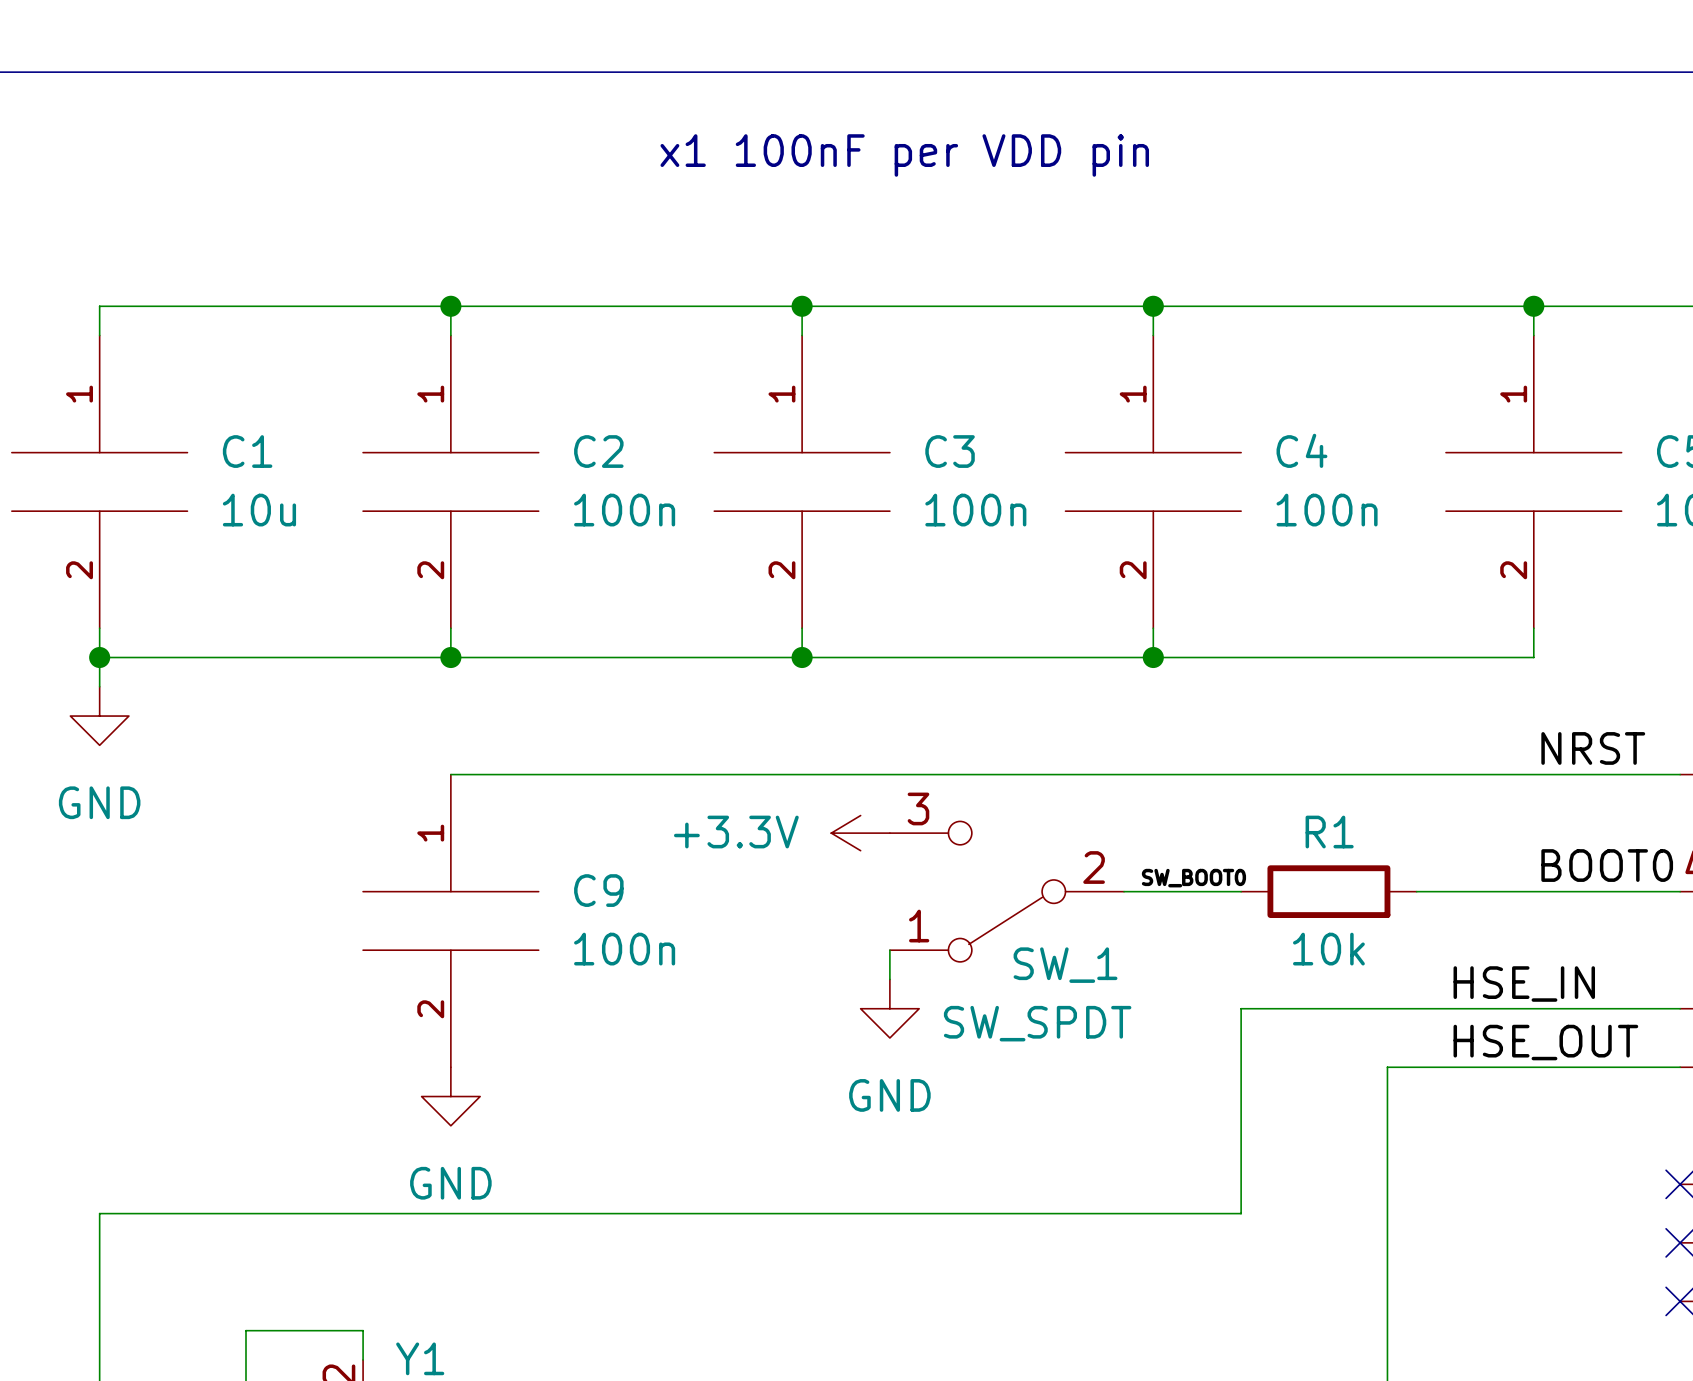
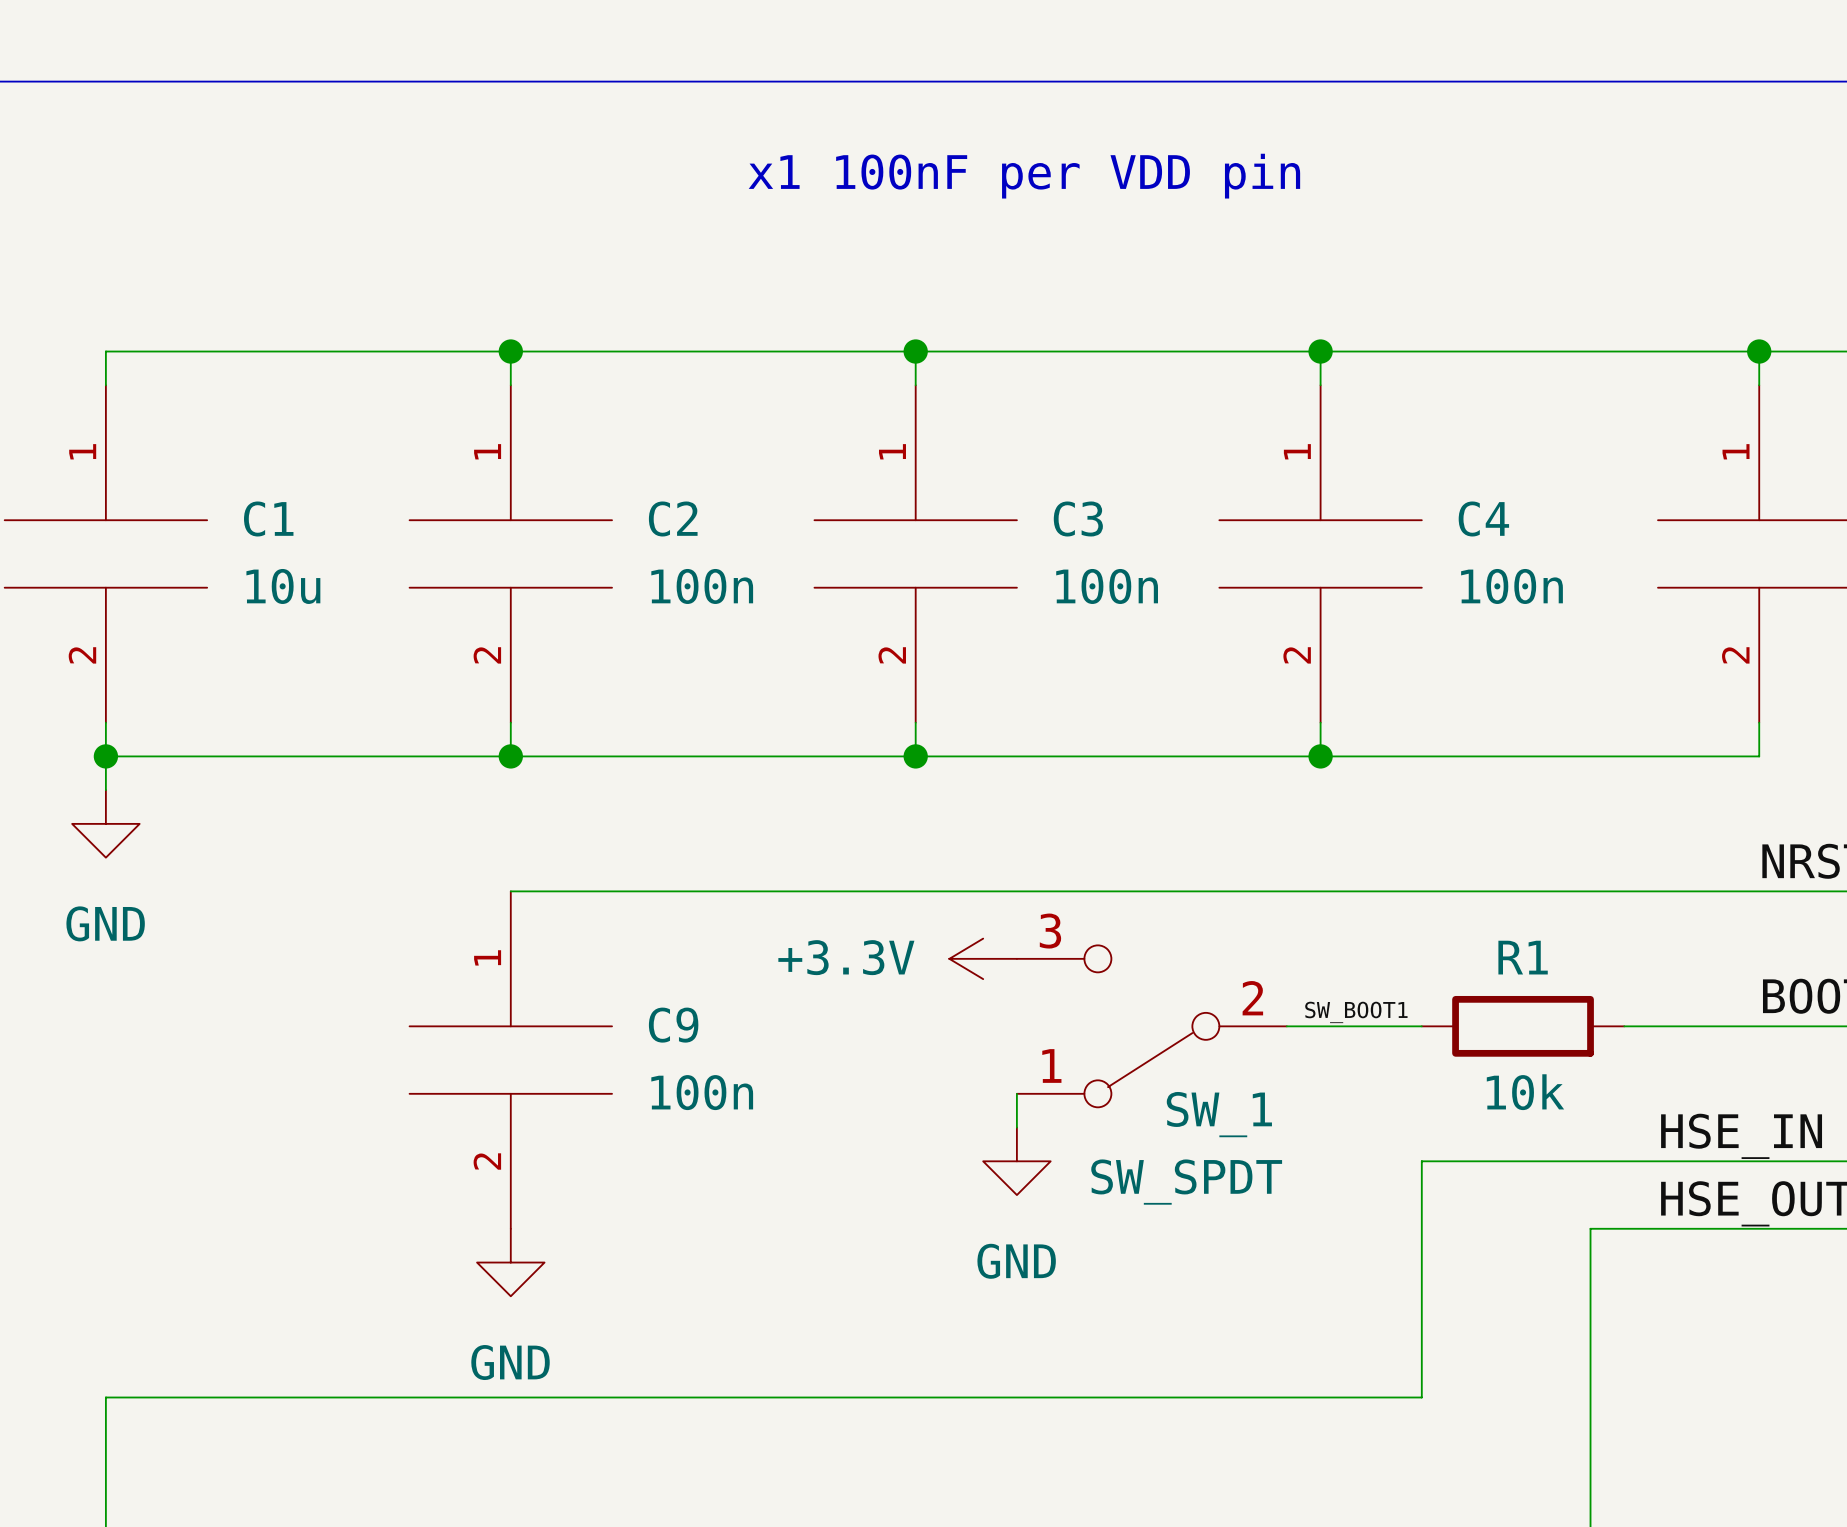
label: SW_BOOT0 (1193, 878) -> SW_BOOT1 (1356, 1012)

